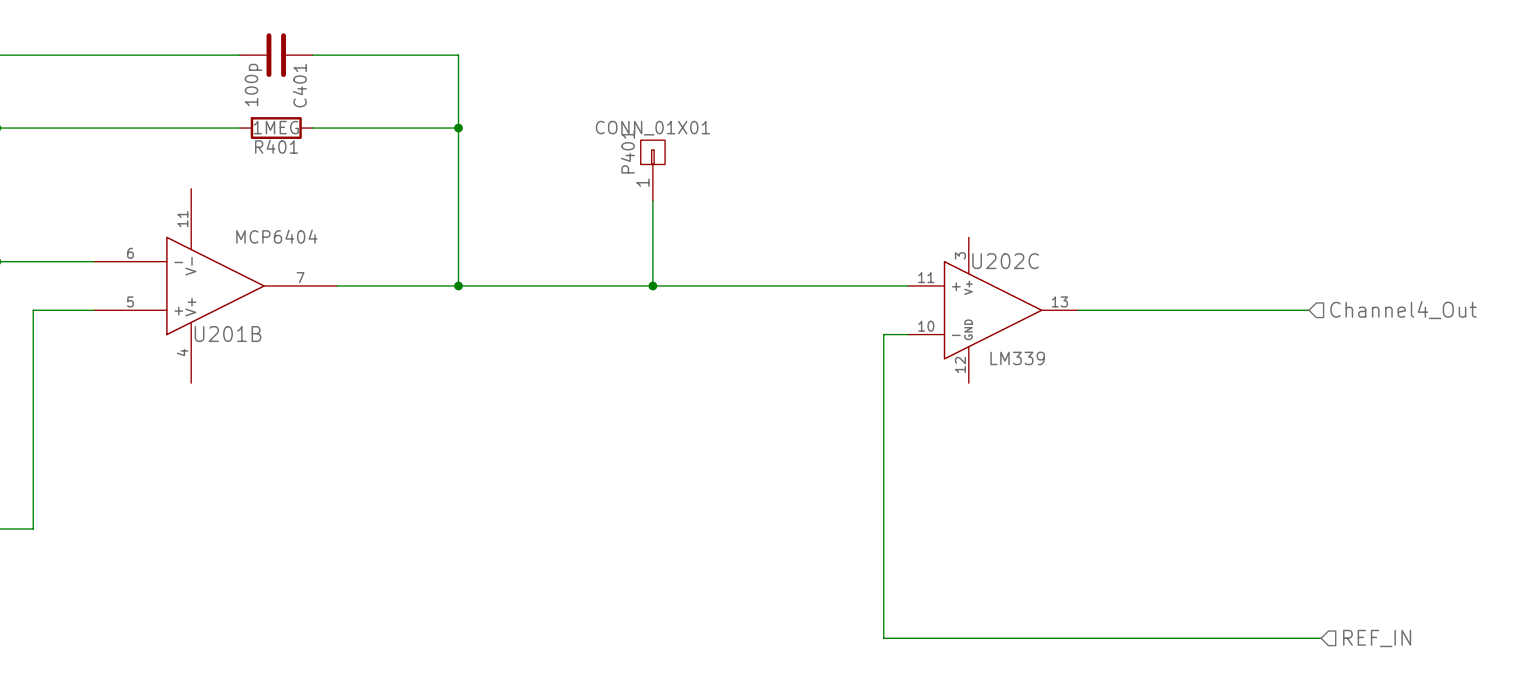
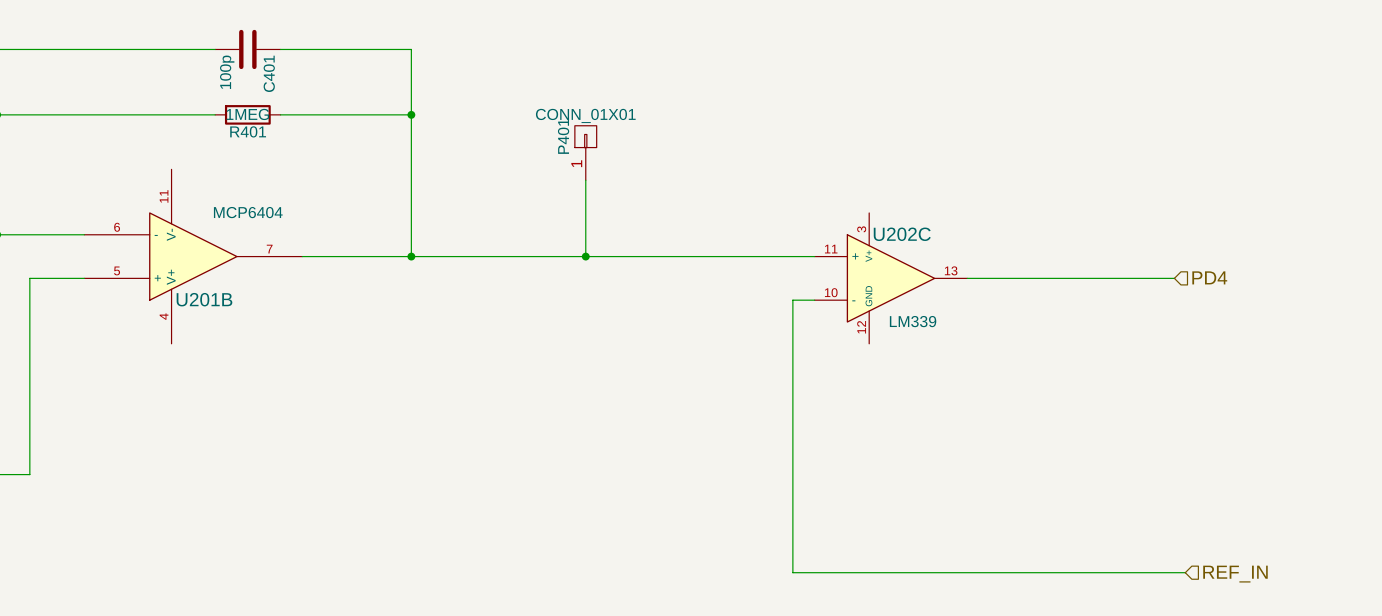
hierarchical label: Channel4_Out (1403, 310) -> PD4 (1209, 277)

